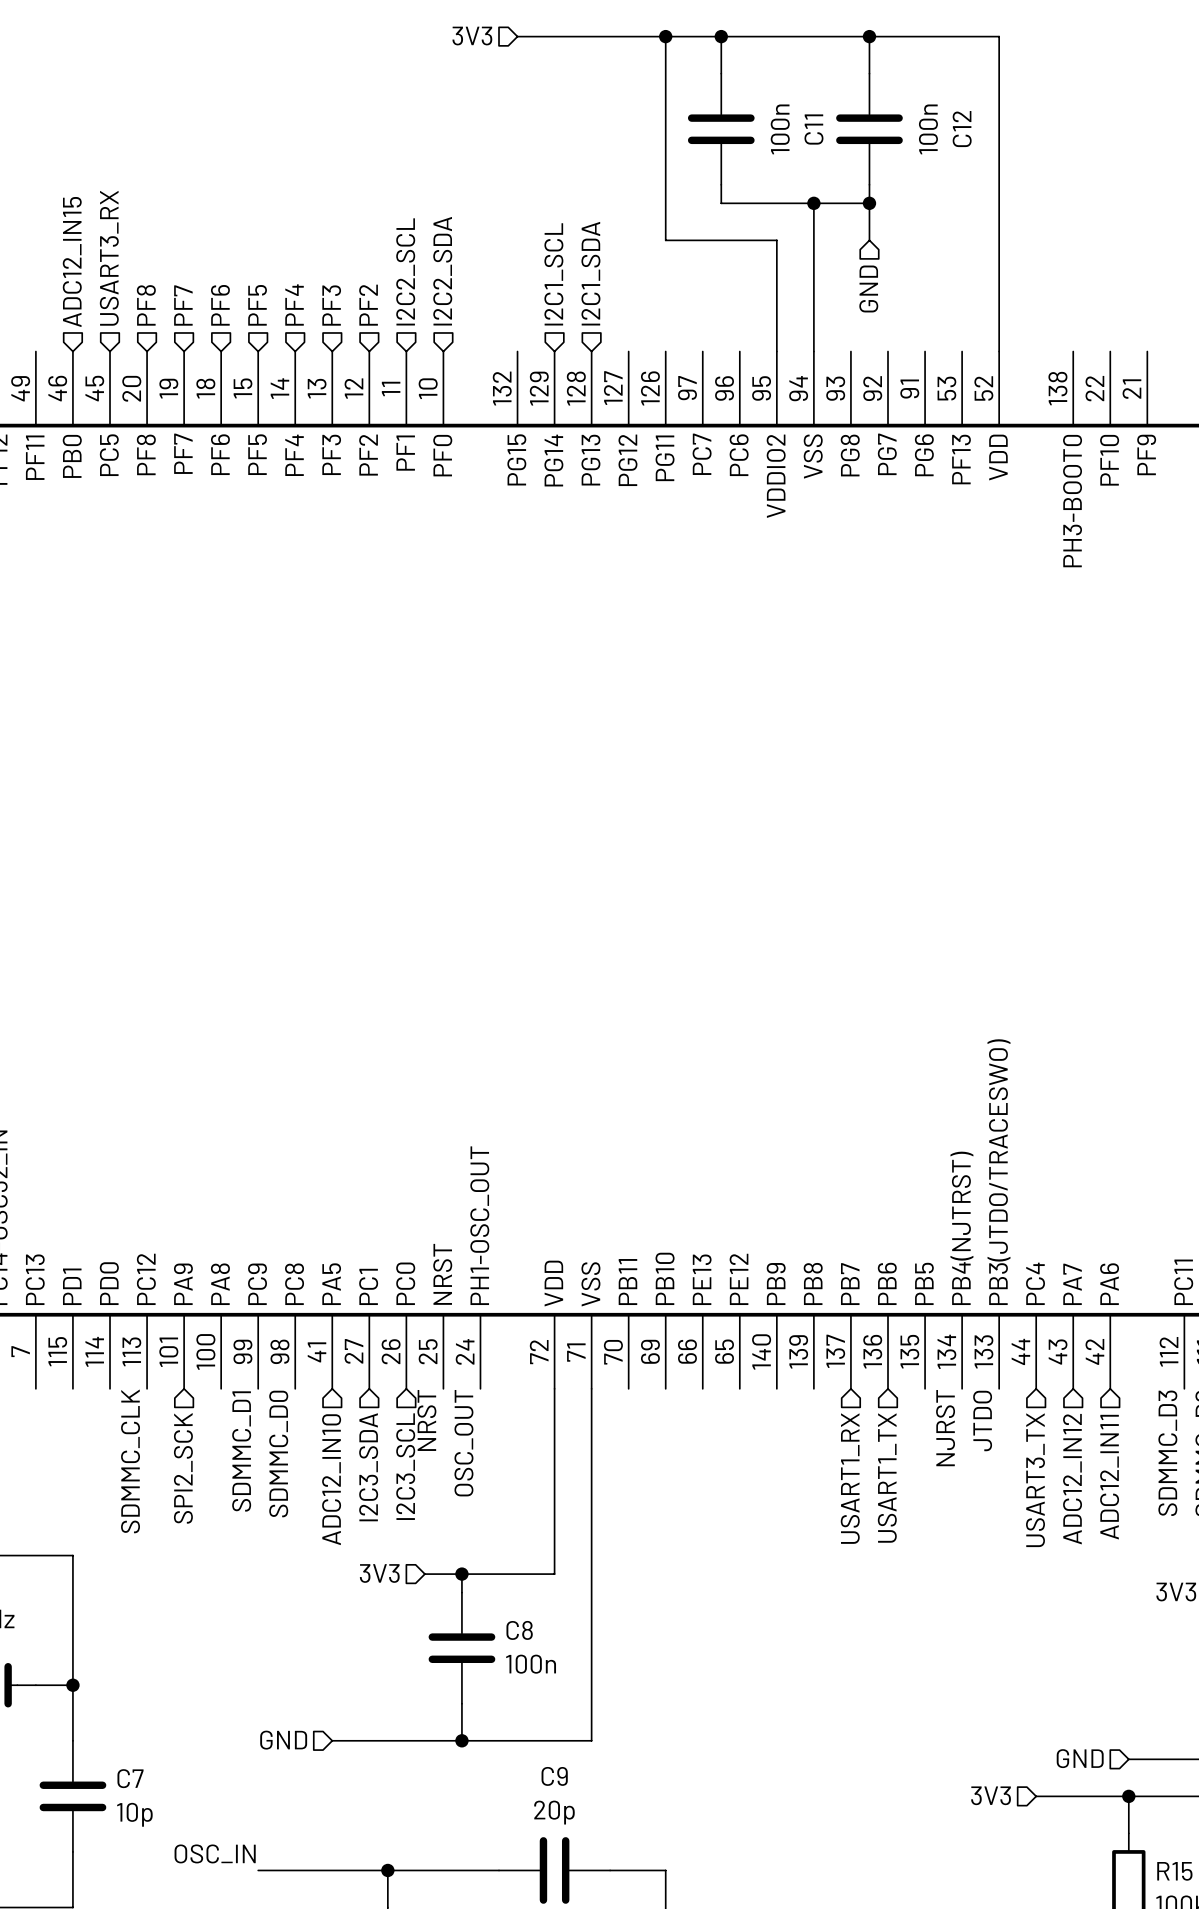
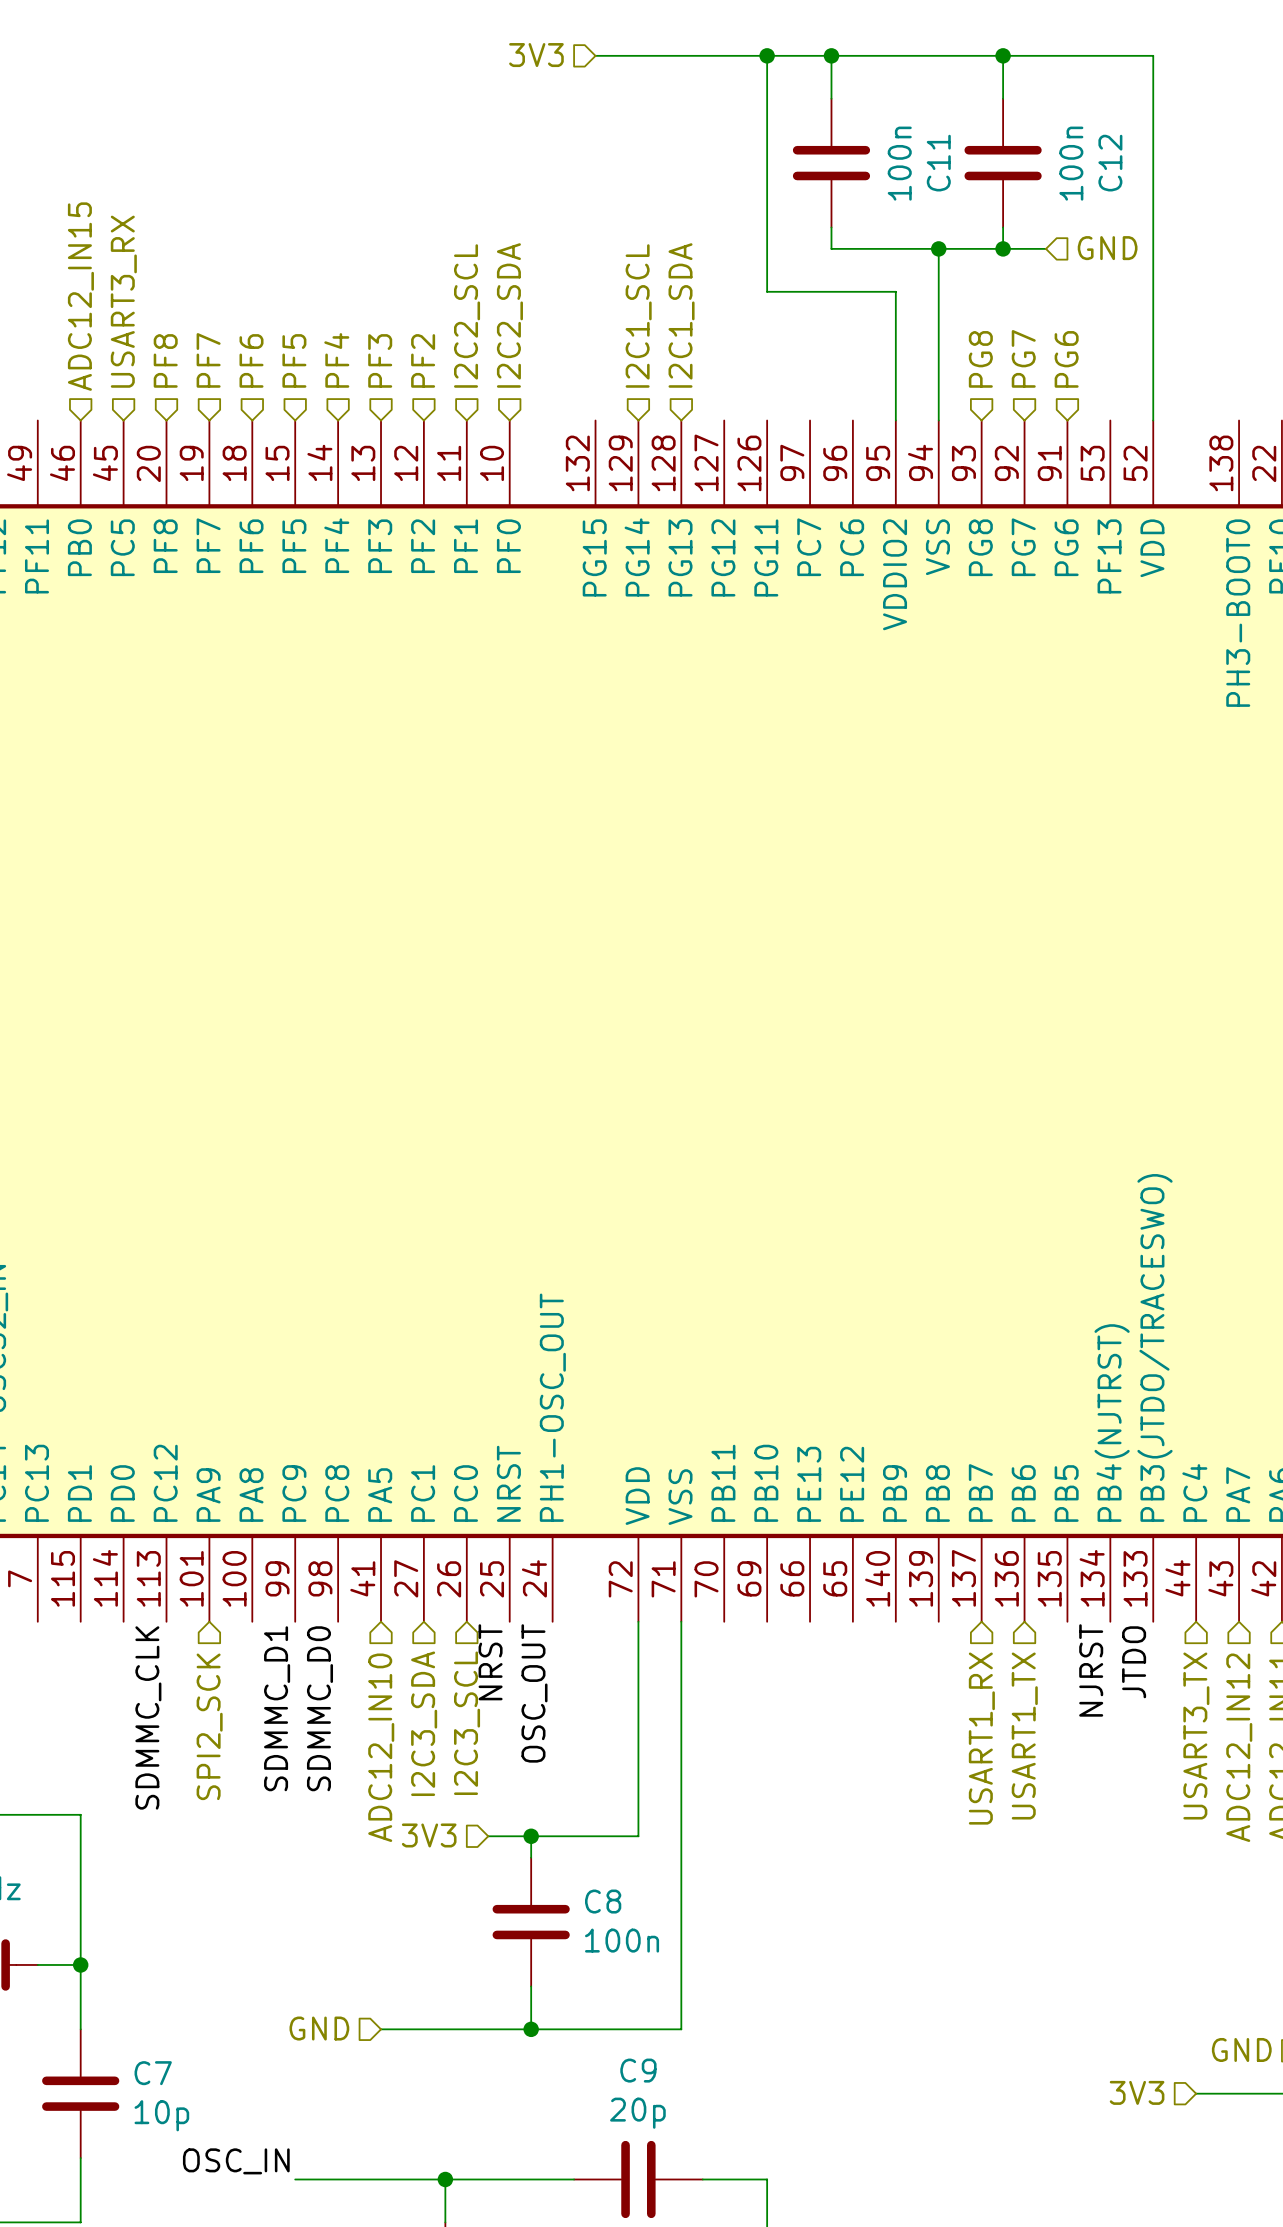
wire: (869, 203) (869, 240) -> (1003, 248) (1045, 248)
hierarchical label rotation: 0° (868, 289) -> 90° counterclockwise (1107, 248)
hierarchical label position: GND (868, 289) -> GND (1107, 248)
hierarchical label: none -> PG8 (980, 359)
hierarchical label: none -> PG7 (1023, 358)
hierarchical label: none -> PG6 (1066, 359)

